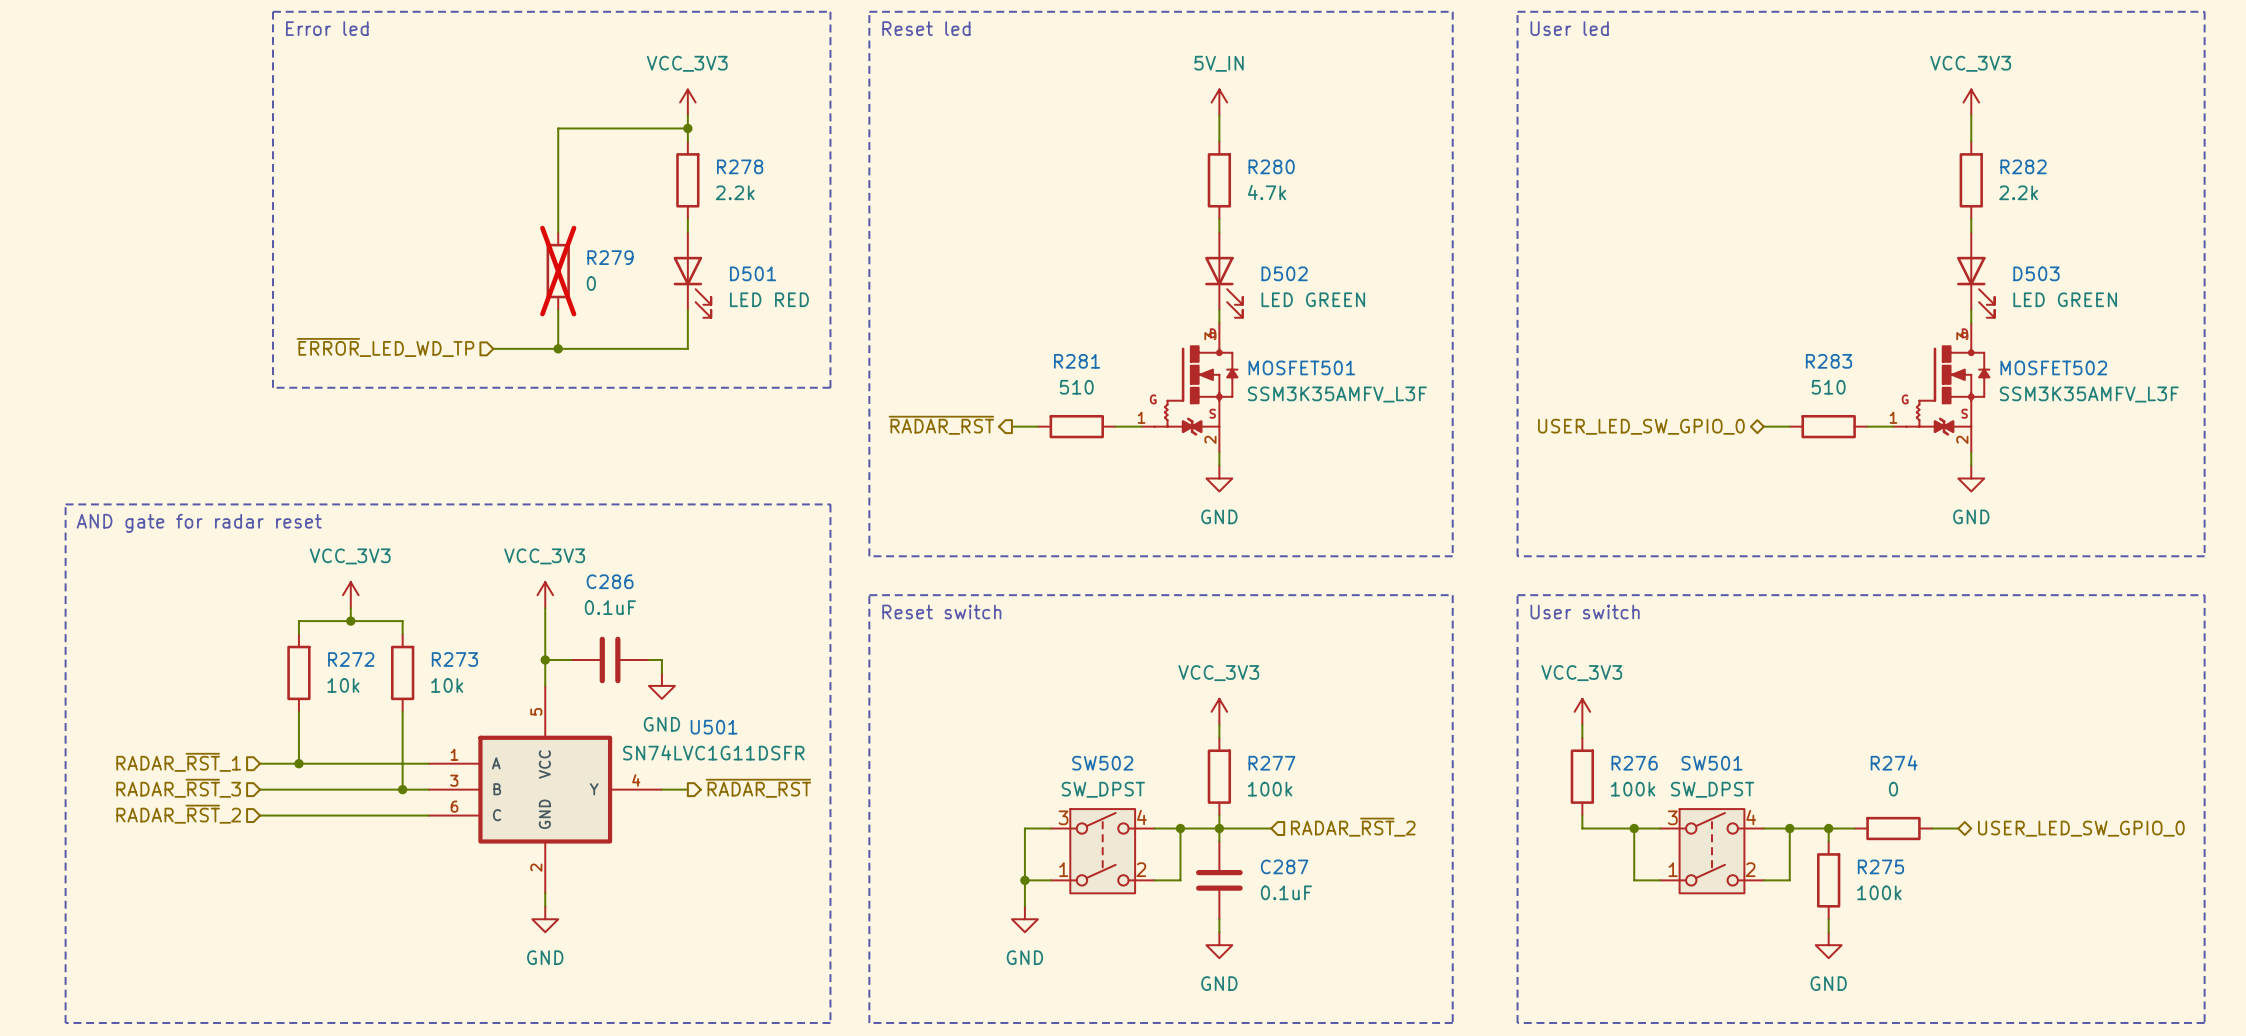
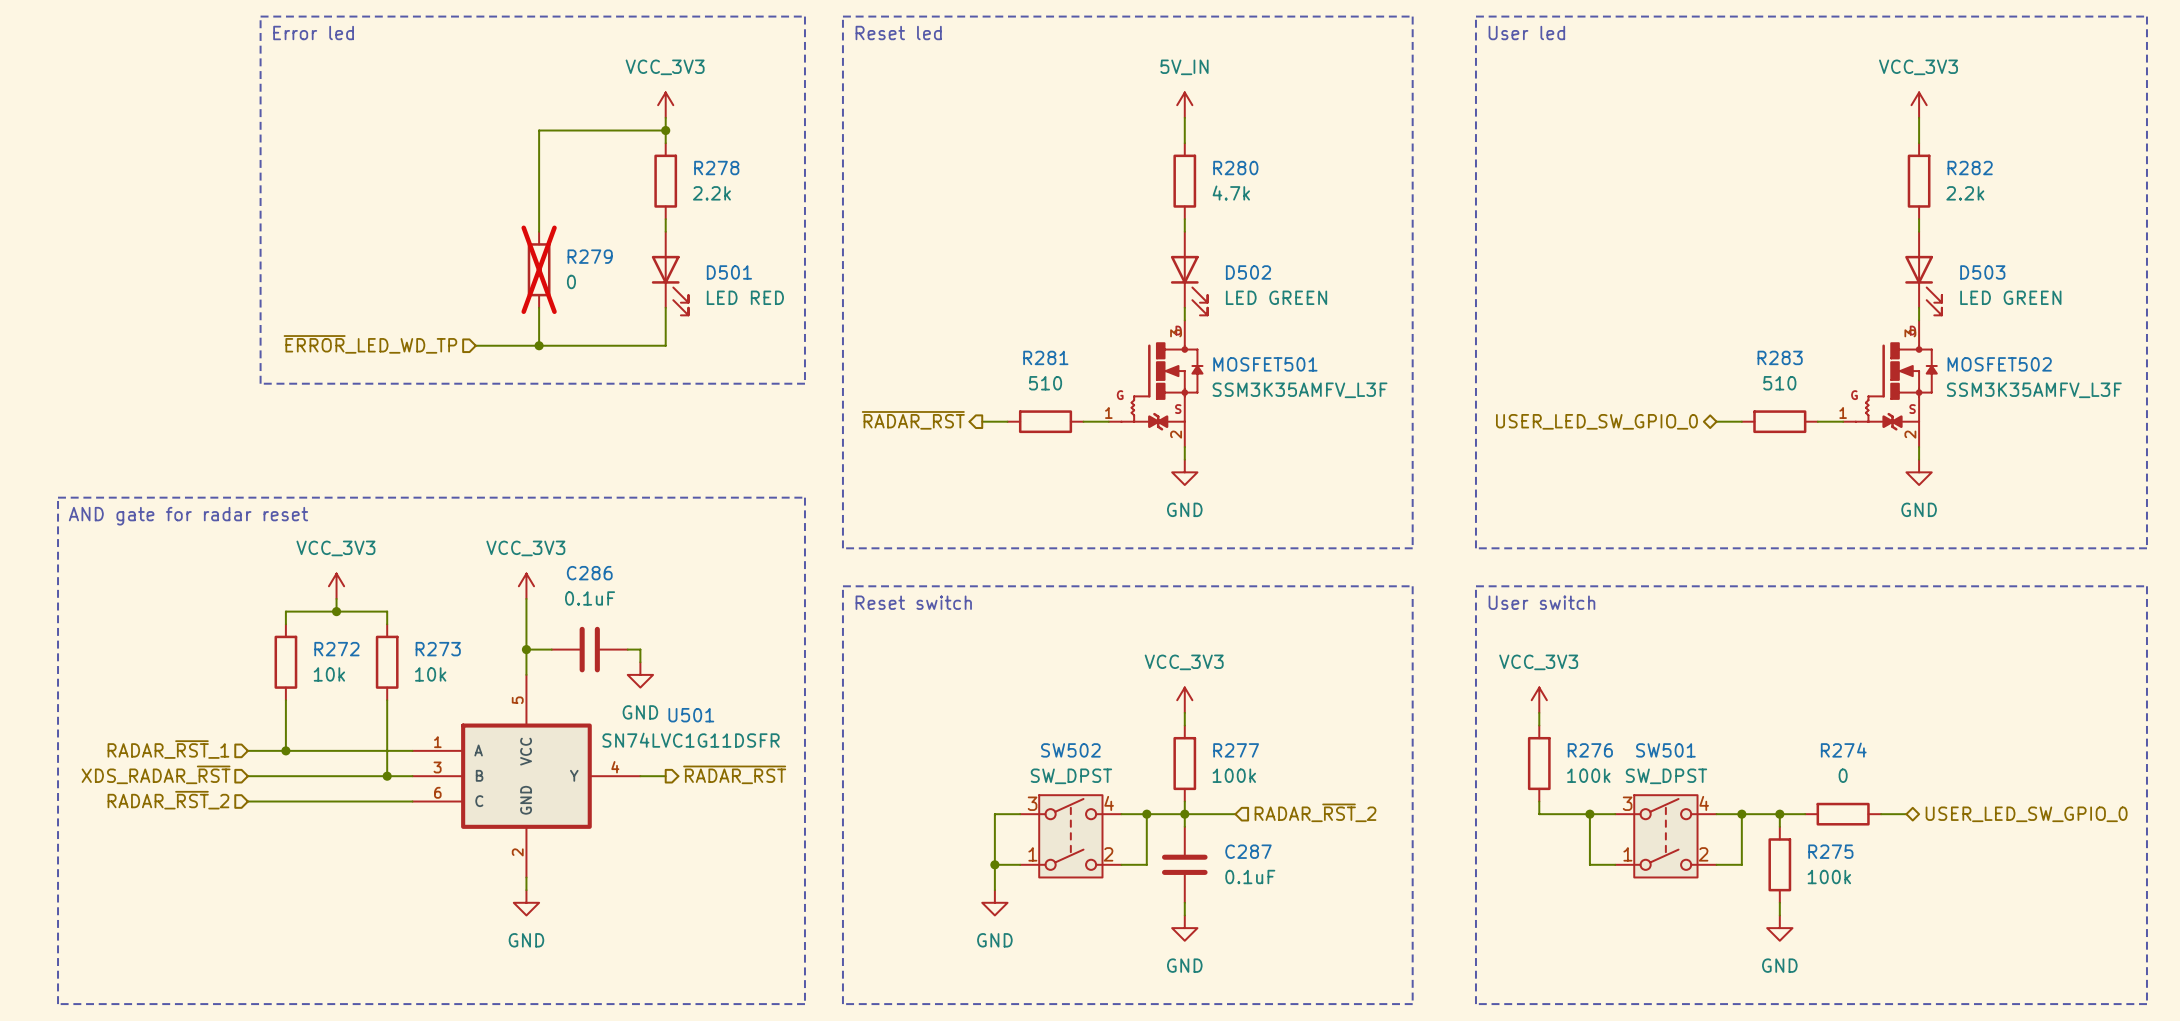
hierarchical label: RADAR_~{RST}_3 (178, 788) -> XDS_RADAR_~{RST} (156, 774)

